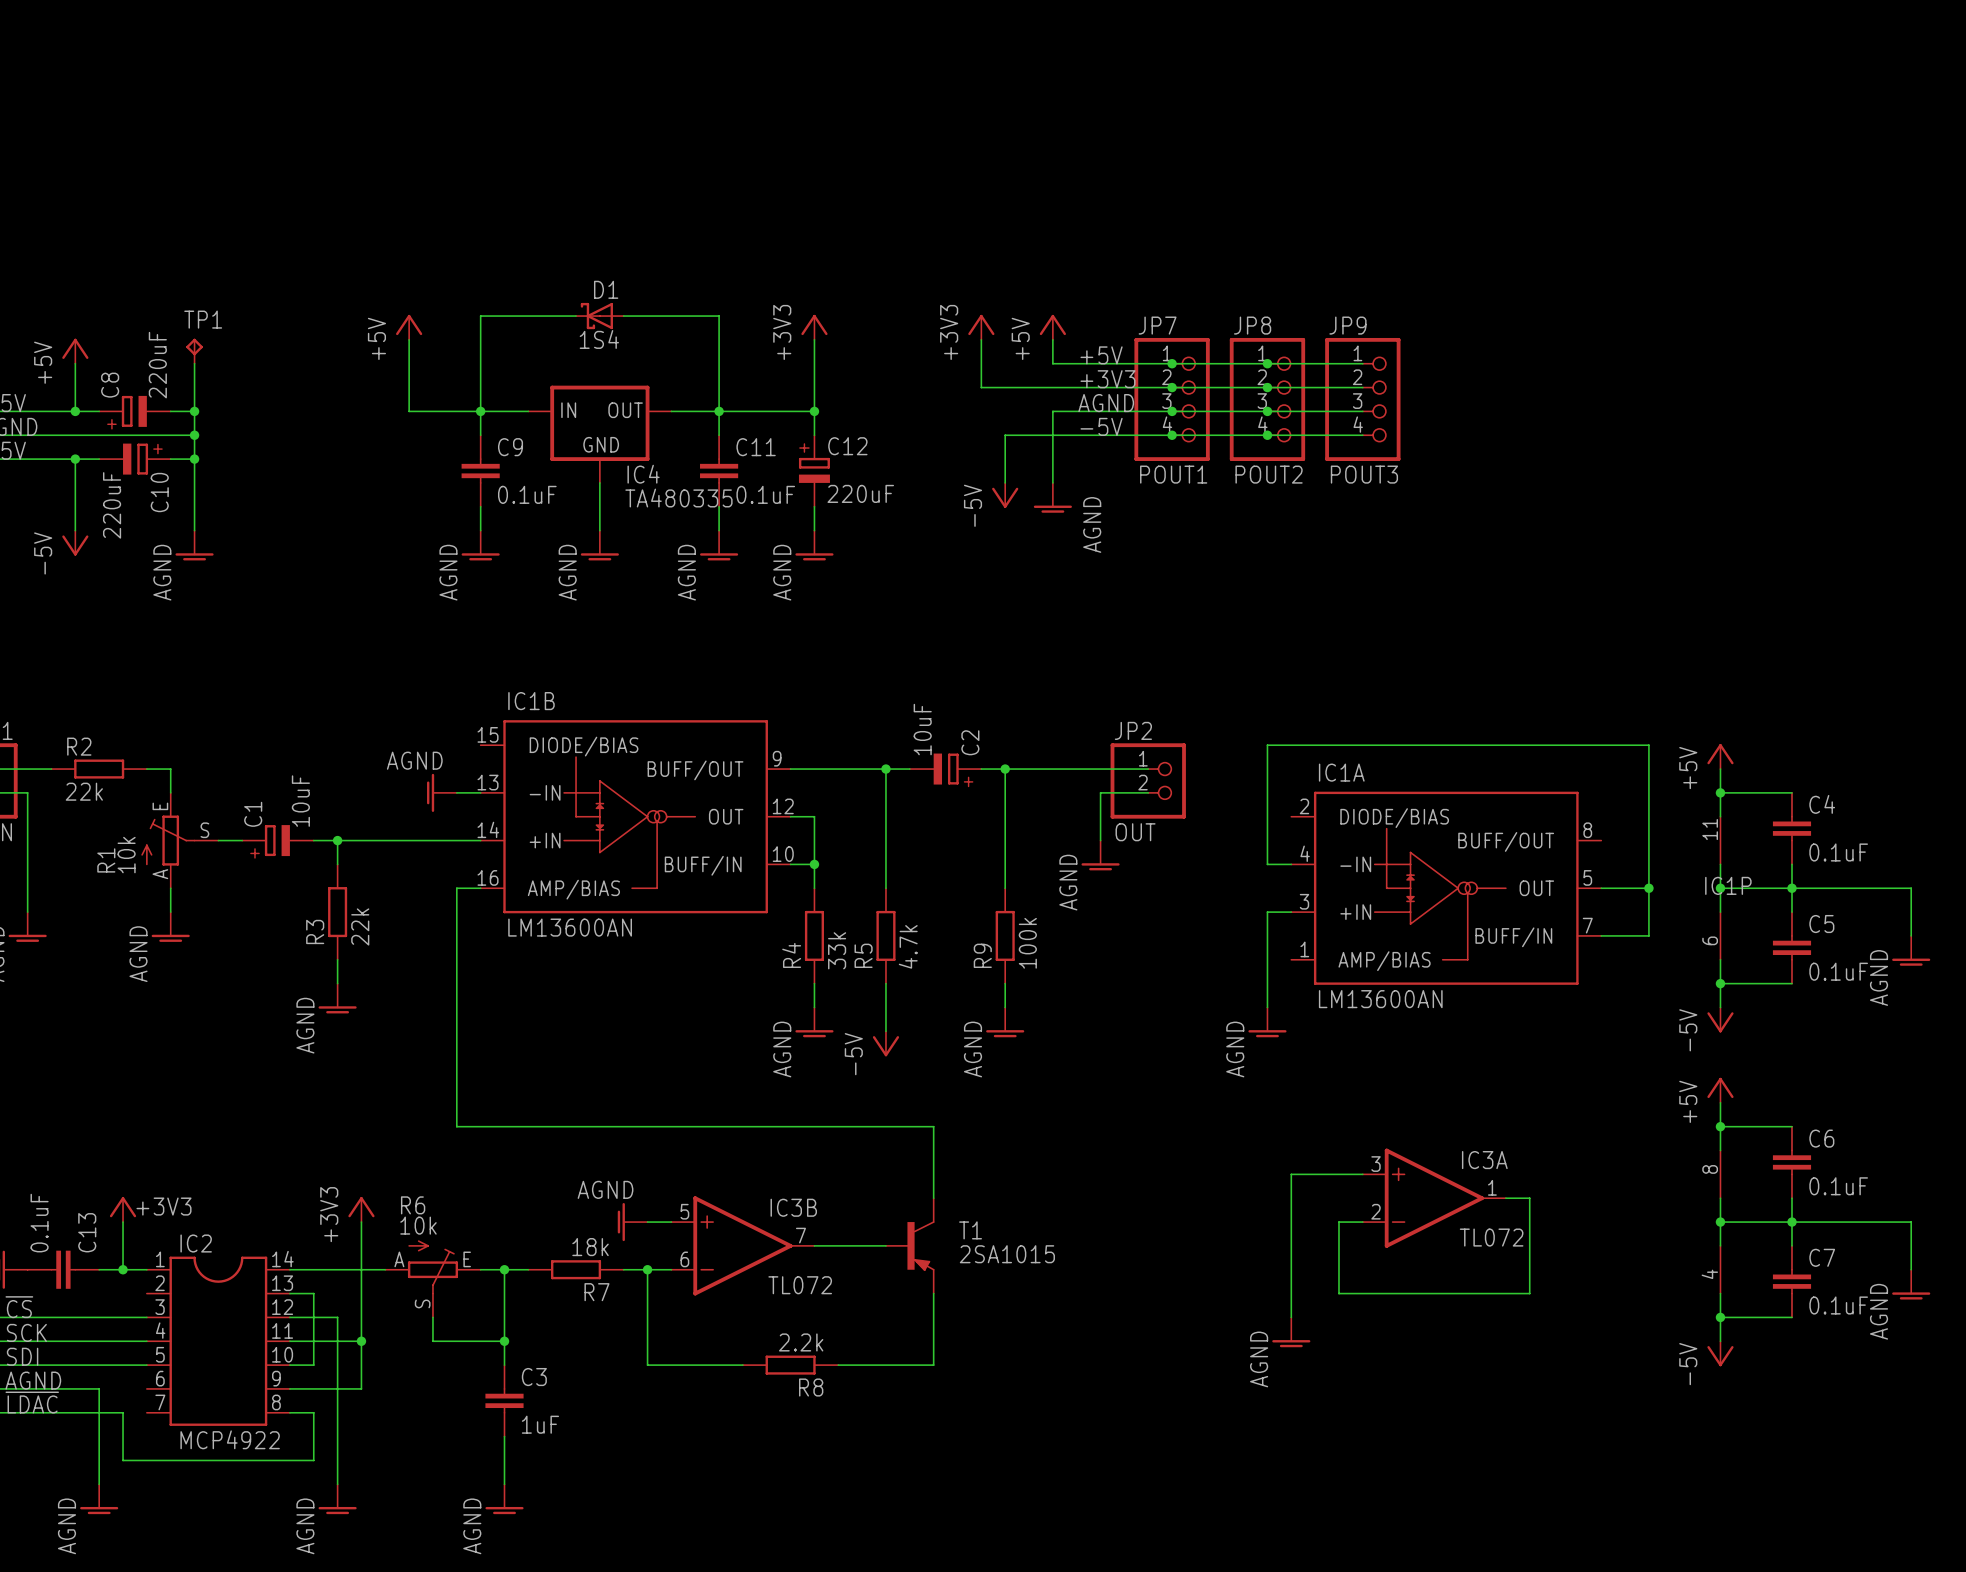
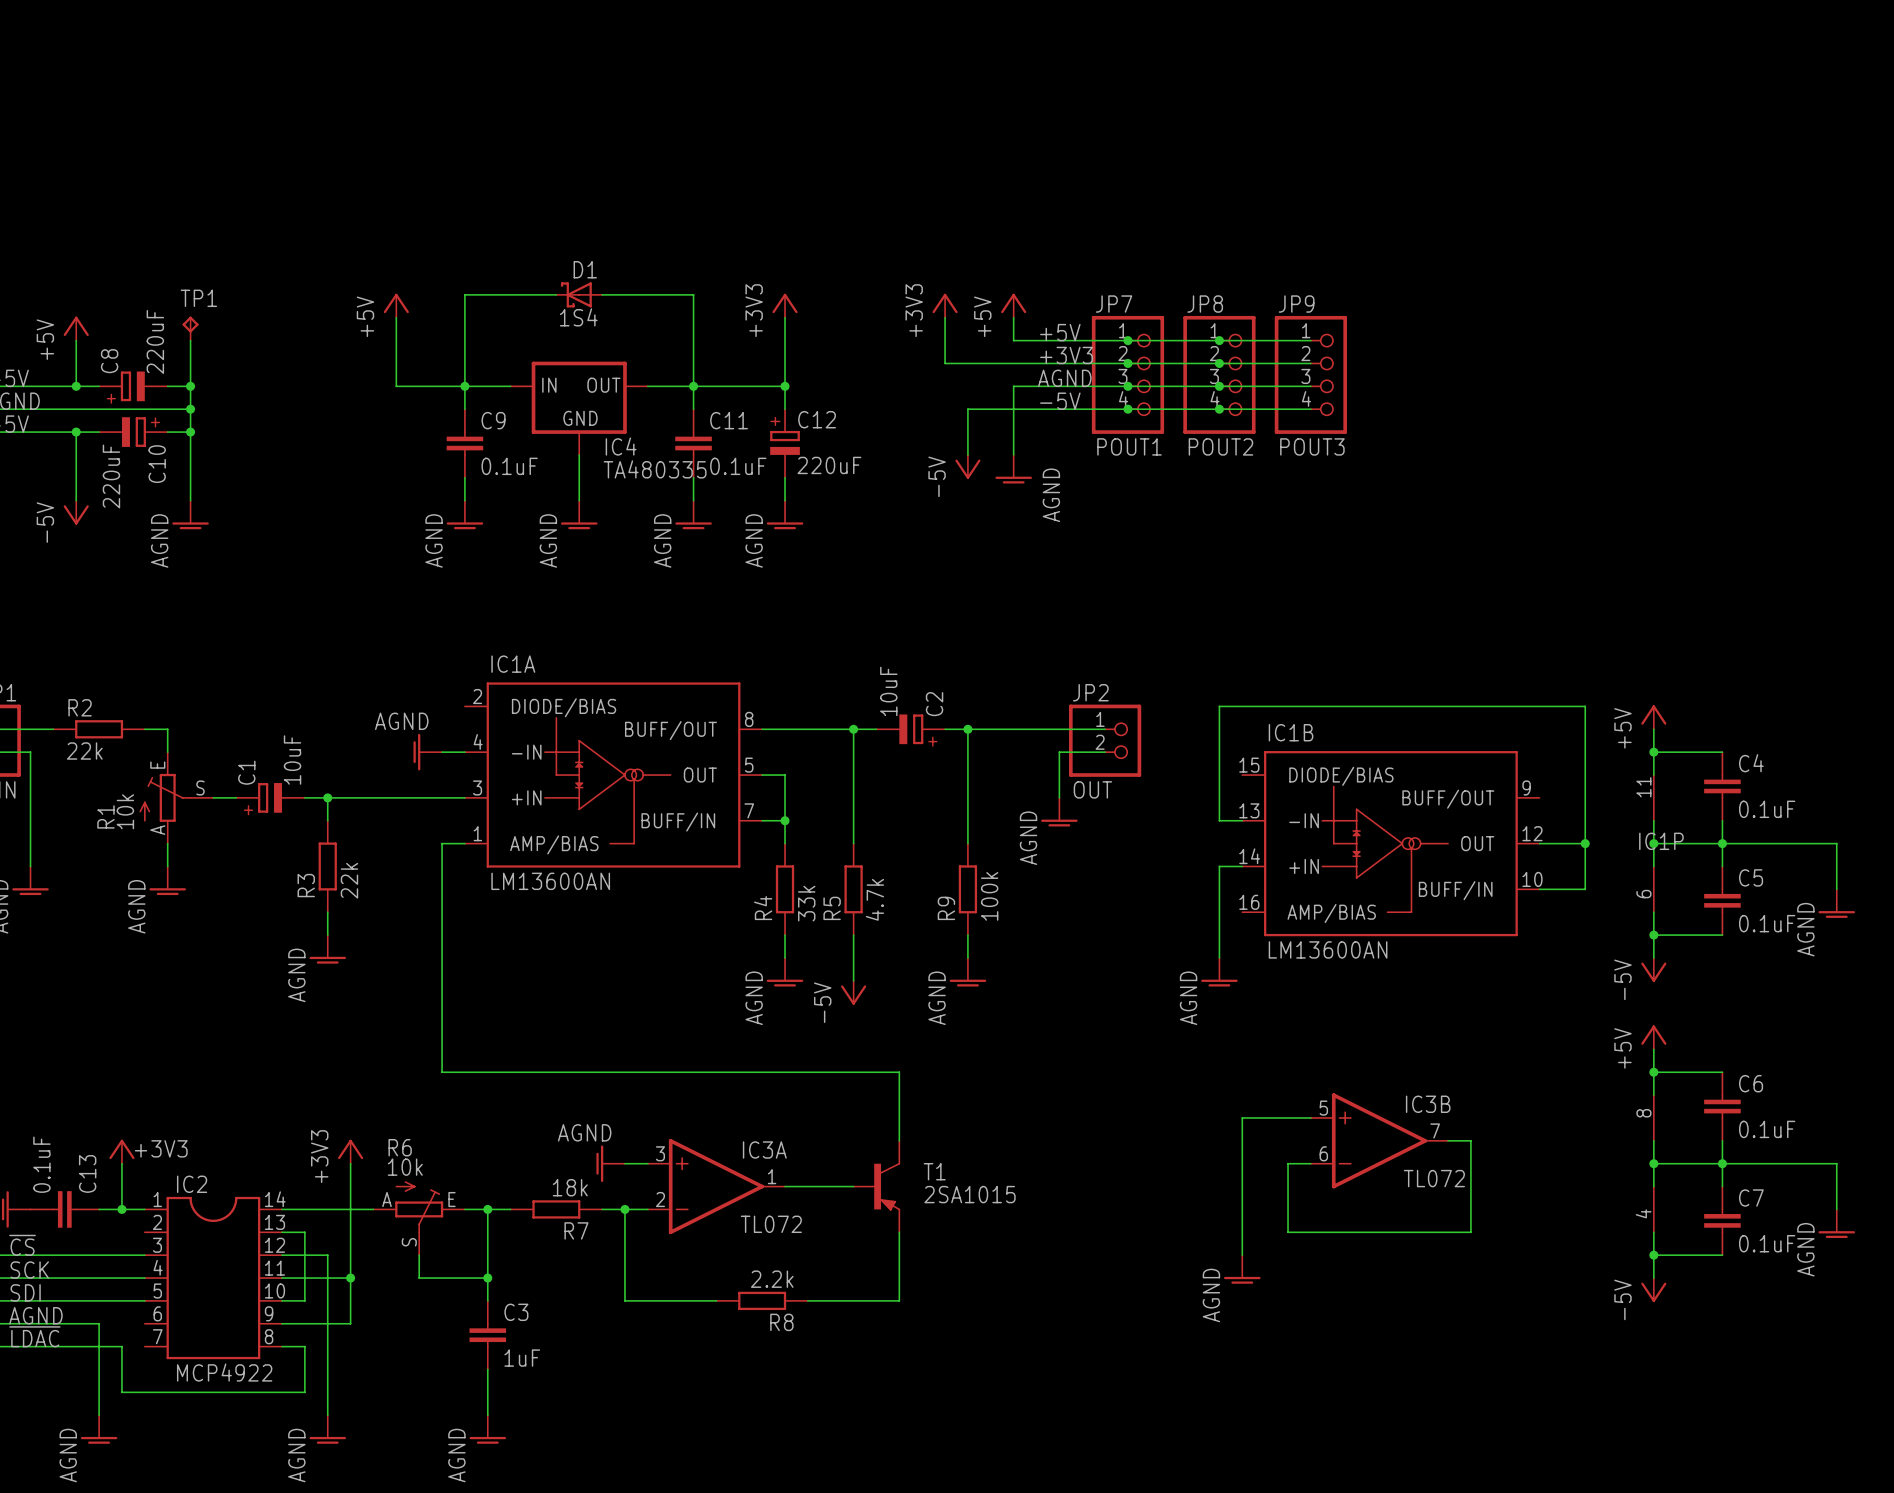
IC1B position: (635, 816) -> (1390, 843)
IC1A position: (1446, 888) -> (613, 775)
IC3A position: (1434, 1198) -> (716, 1186)
IC3B position: (742, 1245) -> (1379, 1140)

